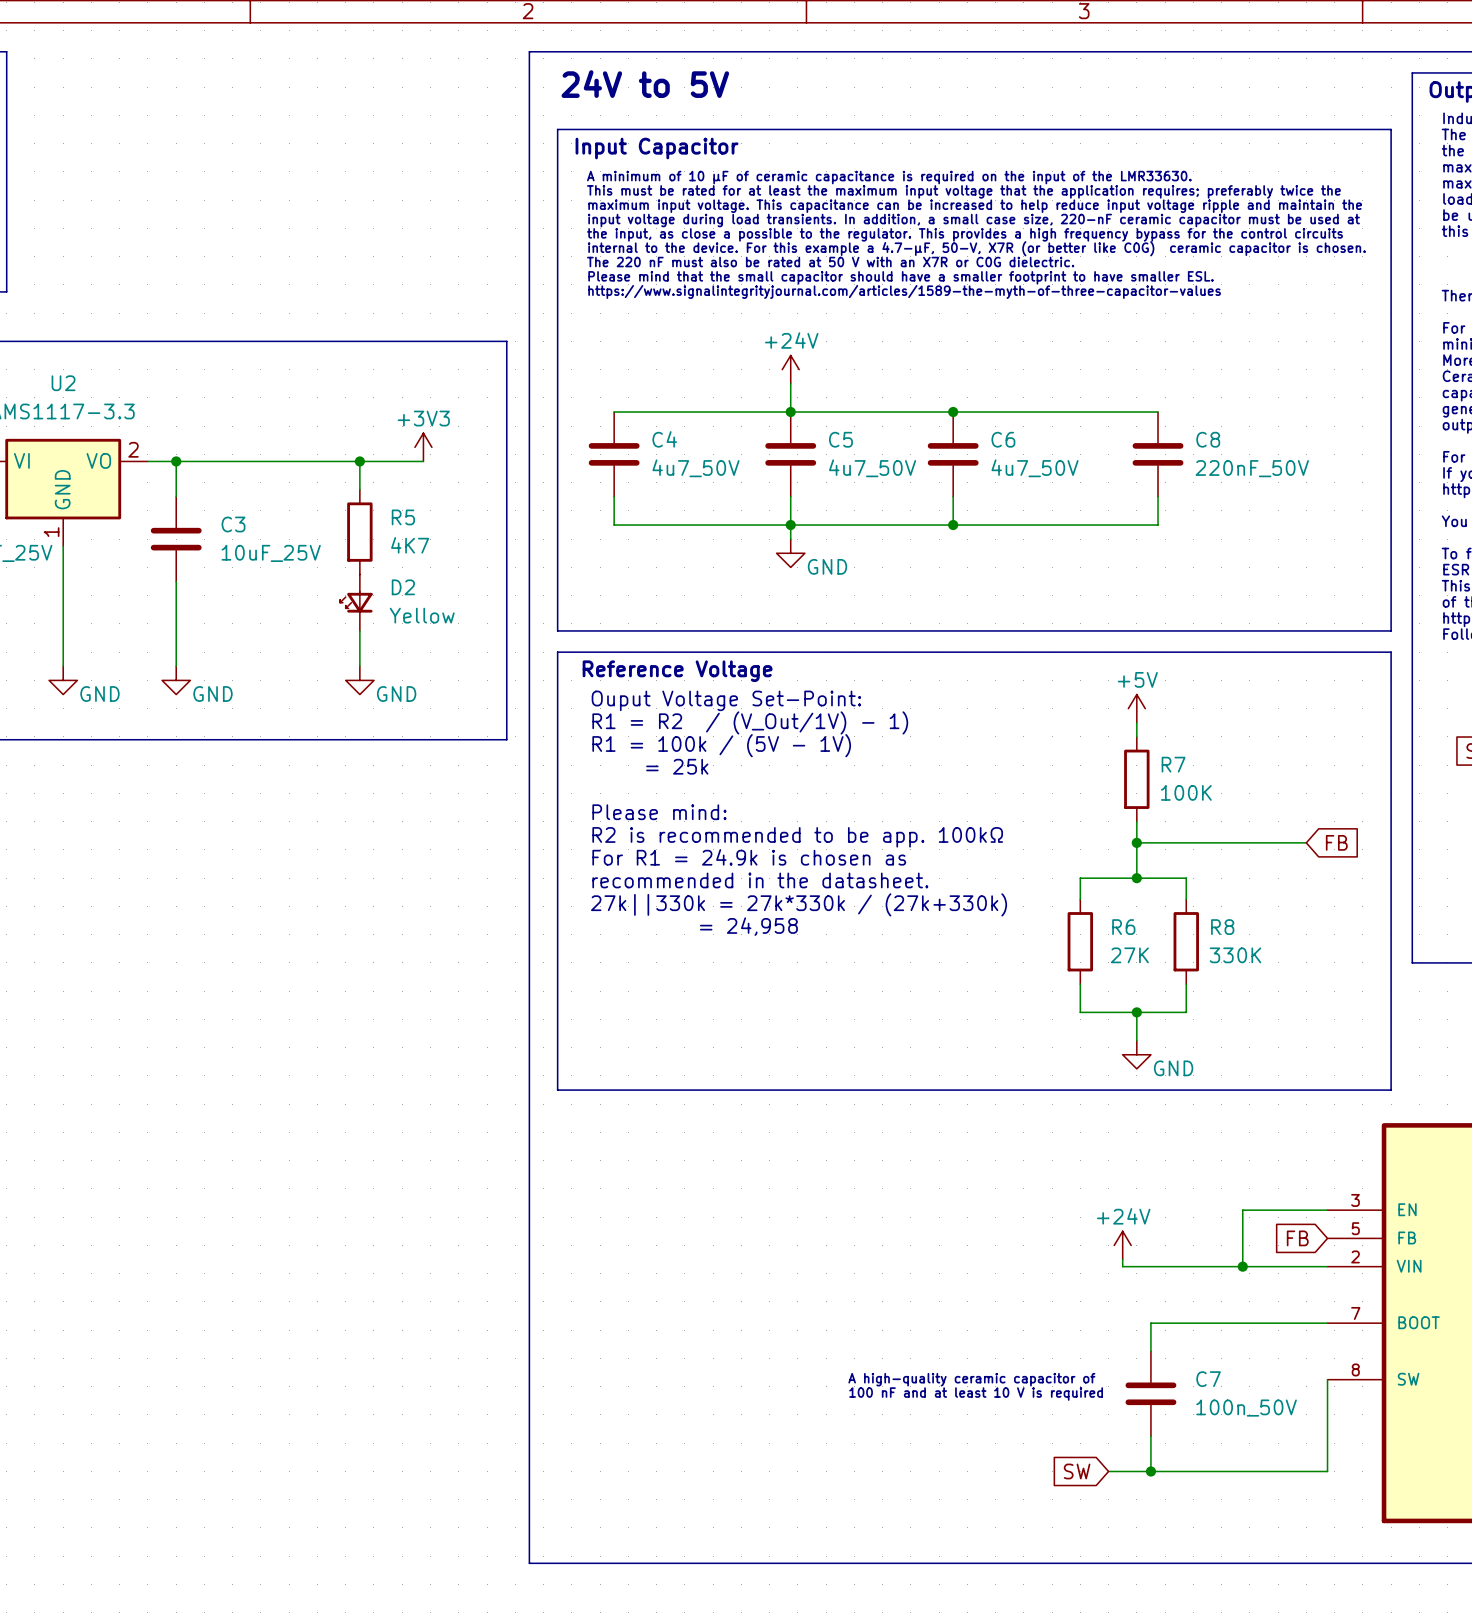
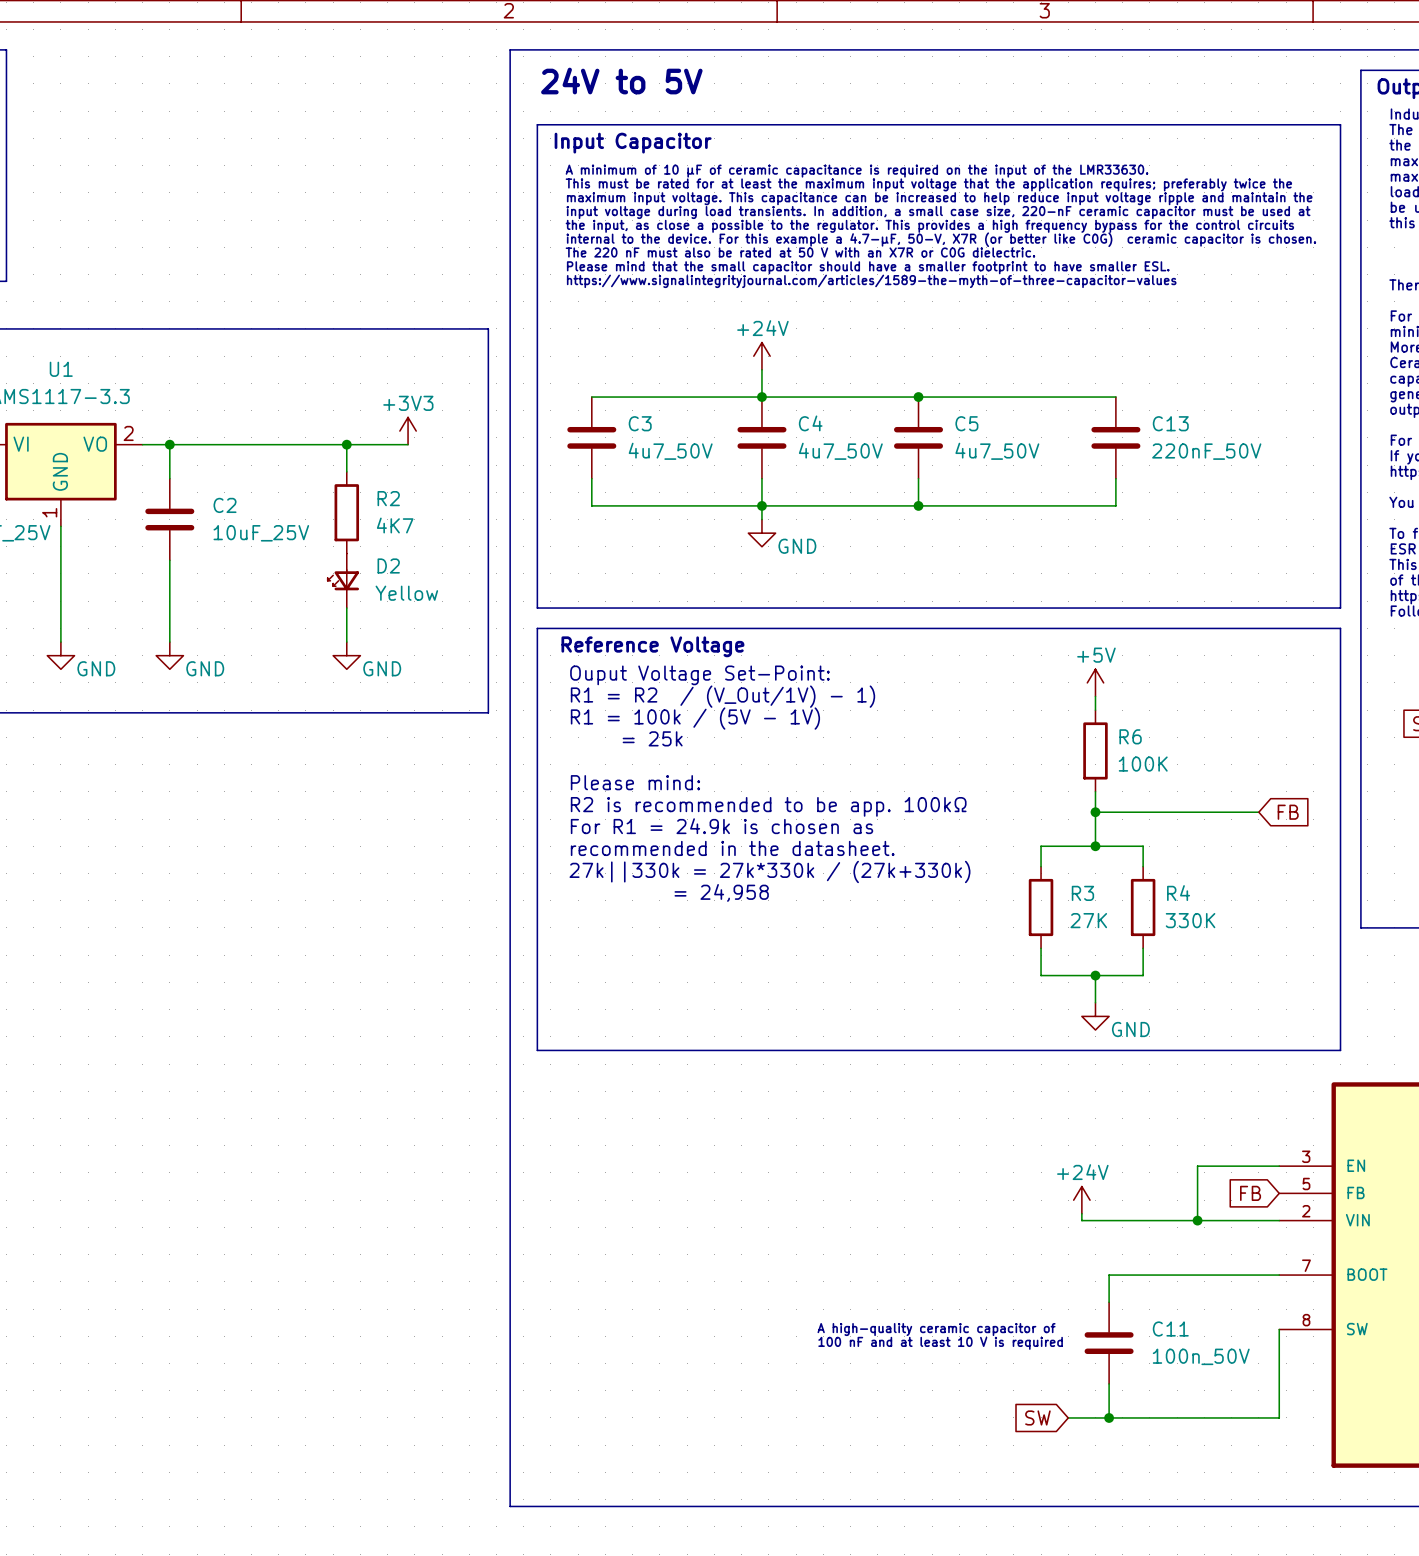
U2 name: U2 (63, 383) -> U1 (61, 369)
C4 name: C4 (664, 439) -> C3 (640, 423)
C5 name: C5 (840, 439) -> C4 (810, 423)
C6 name: C6 (1003, 439) -> C5 (966, 423)
C8 name: C8 (1208, 439) -> C13 (1170, 423)
R5 name: R5 (403, 517) -> R2 (388, 498)
C3 name: C3 (233, 524) -> C2 (225, 505)
R7 name: R7 (1173, 764) -> R6 (1130, 736)
R6 name: R6 (1123, 927) -> R3 (1082, 893)
R8 name: R8 (1222, 927) -> R4 (1178, 893)
C7 name: C7 (1208, 1379) -> C11 (1170, 1328)

